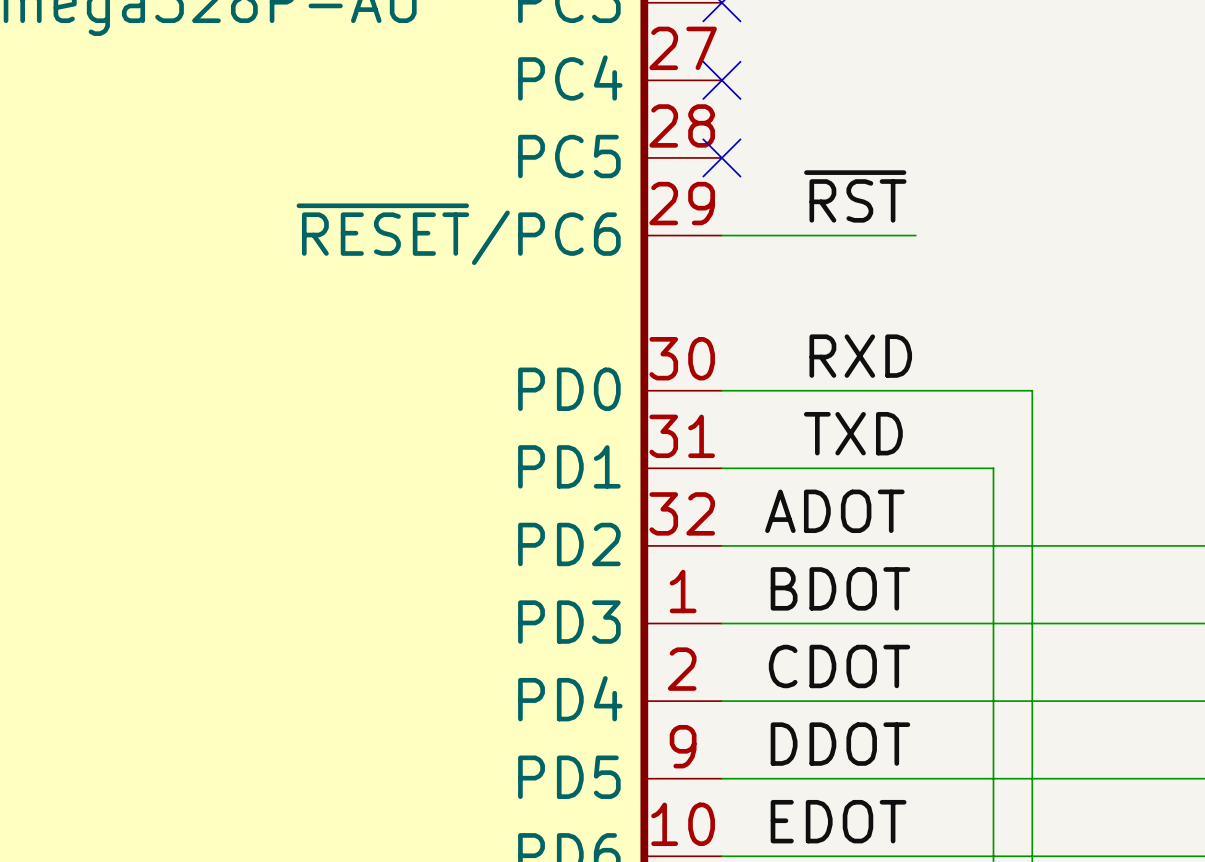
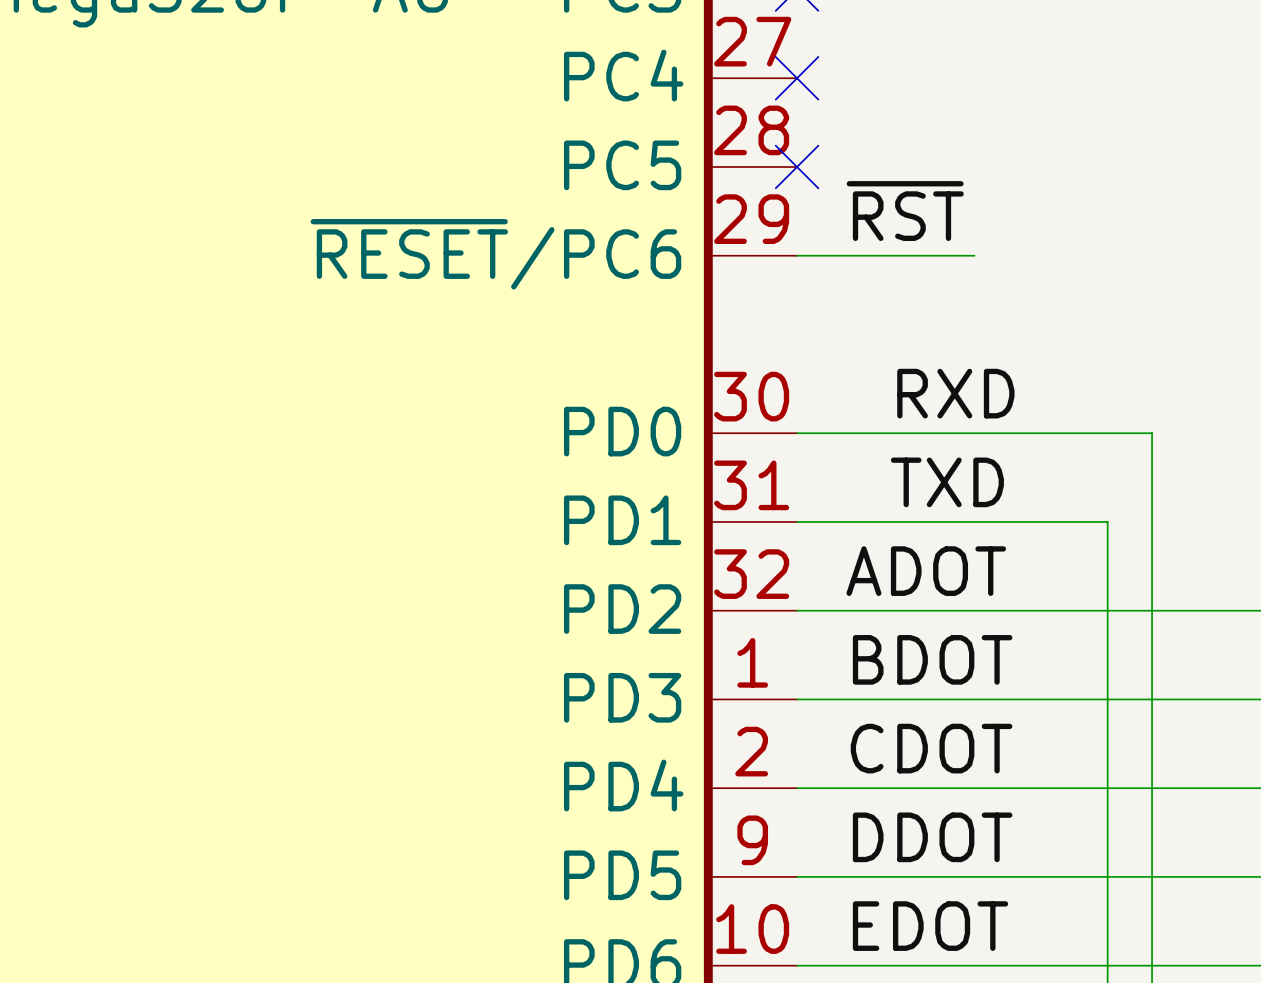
label position: ~{RST} (855, 196) -> ~{RST} (905, 211)
wire: (877, 235) (915, 235) -> none

